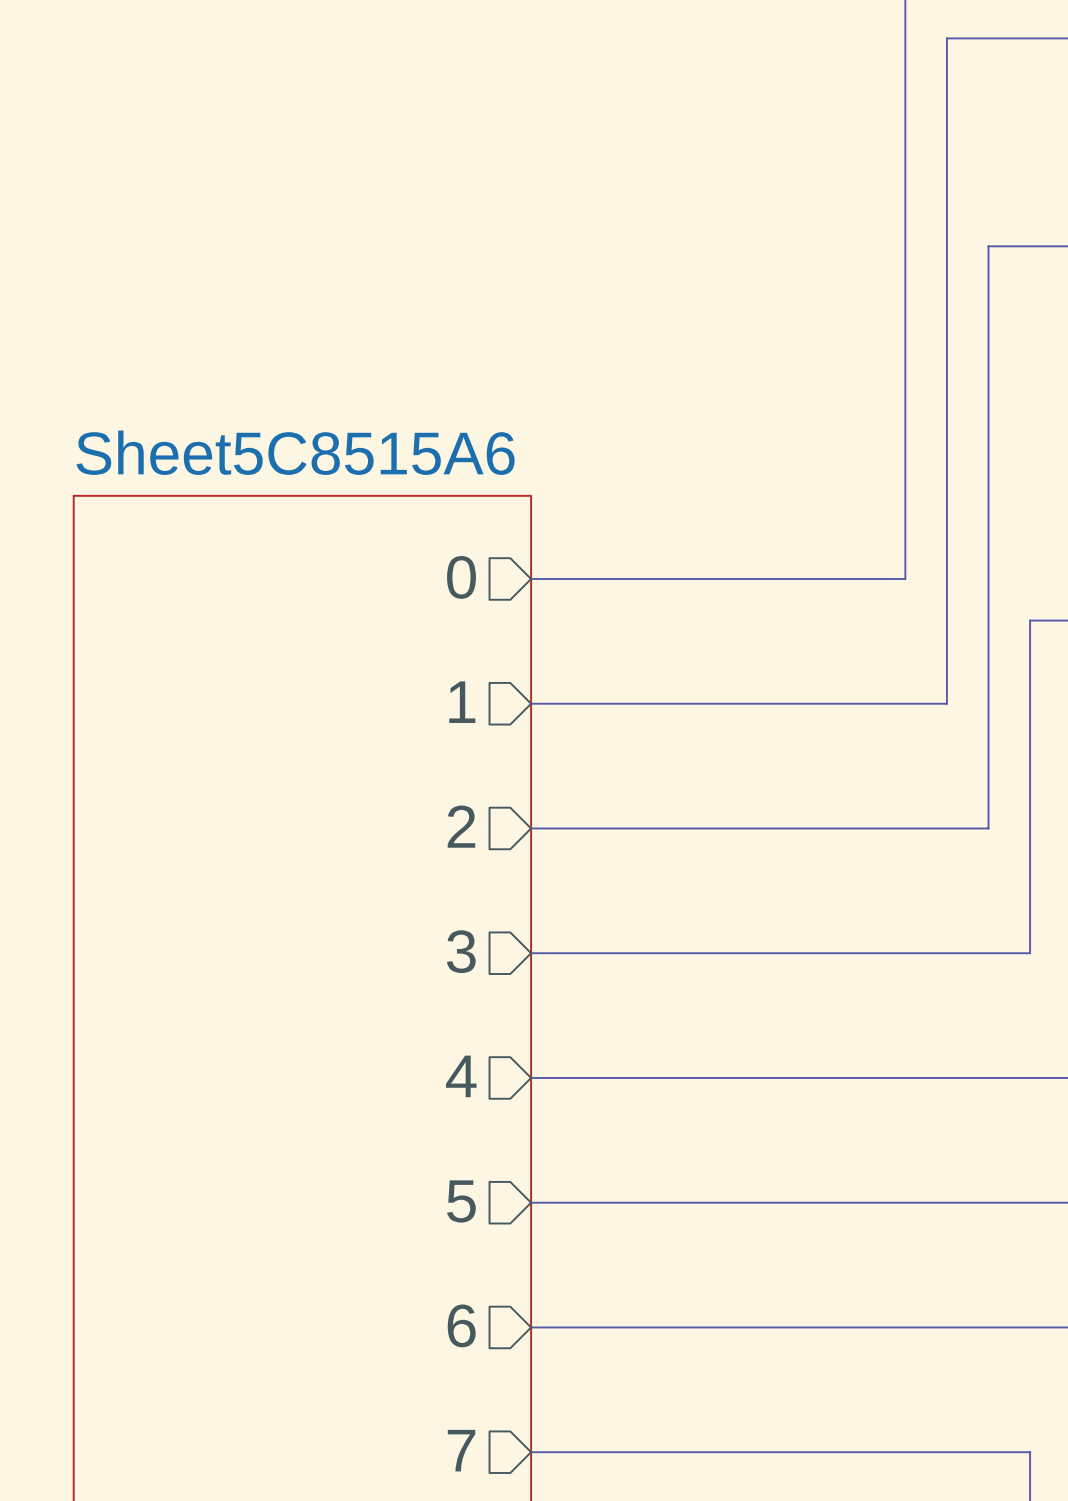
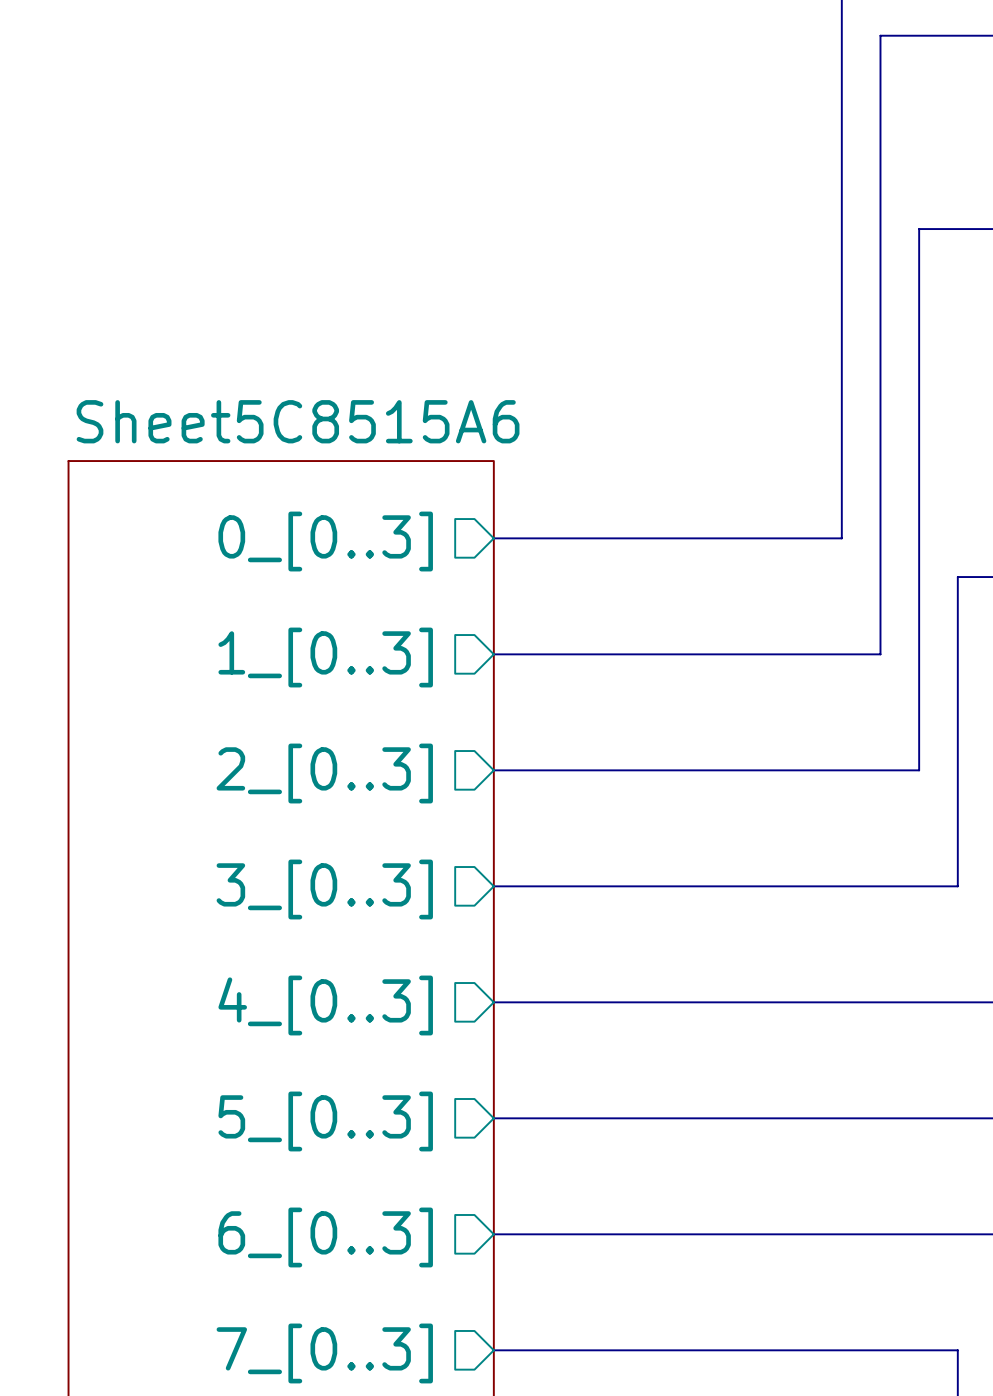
sheet pin: 0 (461, 577) -> 0_[0..3] (325, 541)
sheet pin: 1 (462, 702) -> 1_[0..3] (325, 657)
sheet pin: 2 (461, 826) -> 2_[0..3] (324, 773)
sheet pin: 3 (461, 951) -> 3_[0..3] (324, 889)
sheet pin: 4 (461, 1076) -> 4_[0..3] (325, 1005)
sheet pin: 5 (461, 1201) -> 5_[0..3] (325, 1121)
sheet pin: 6 (461, 1325) -> 6_[0..3] (325, 1237)
sheet pin: 7 (461, 1450) -> 7_[0..3] (324, 1353)

